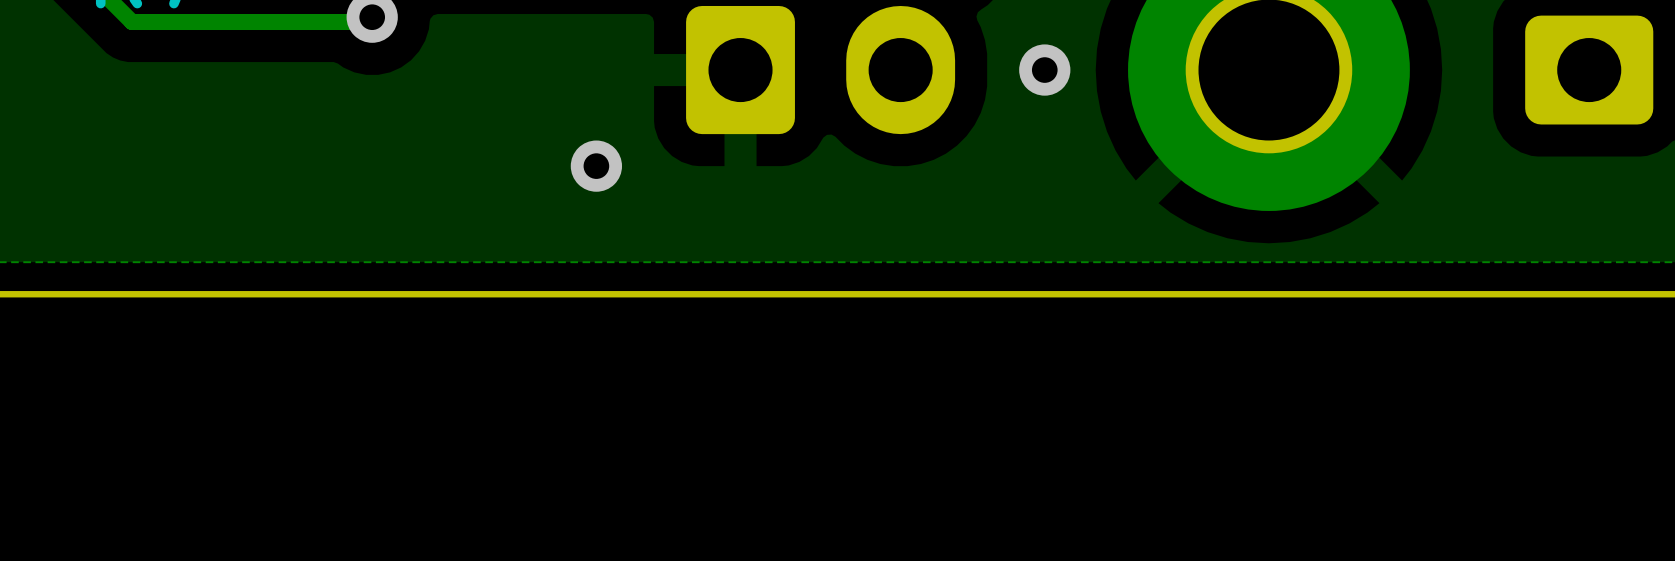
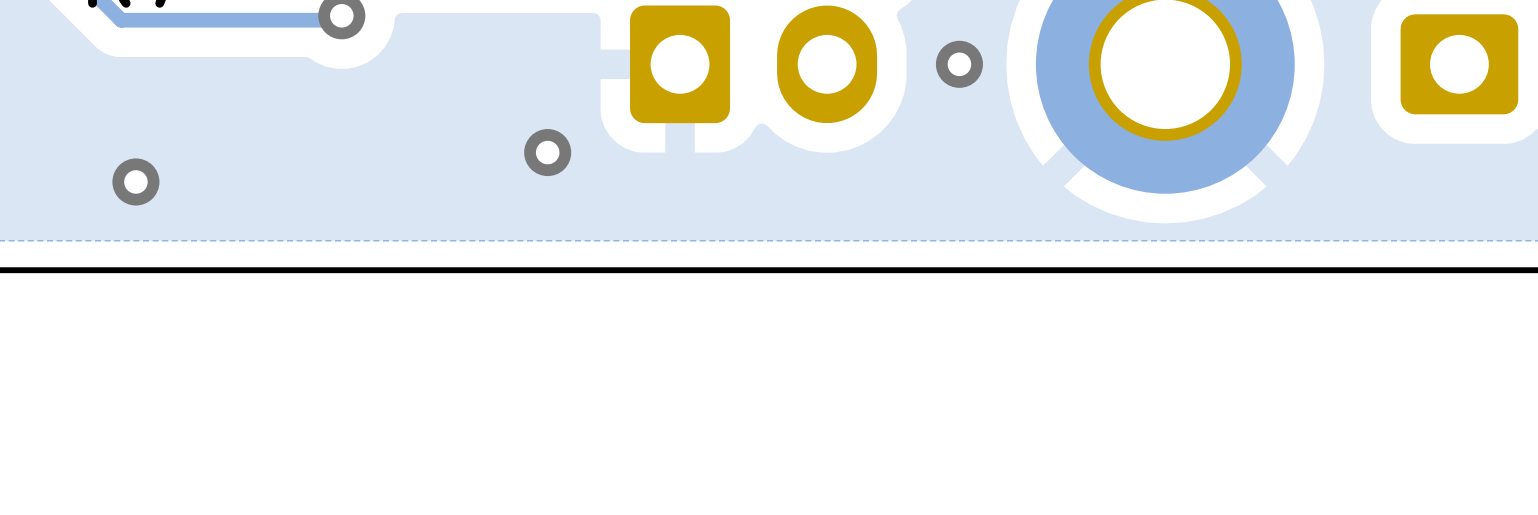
via: none -> (135, 181)

